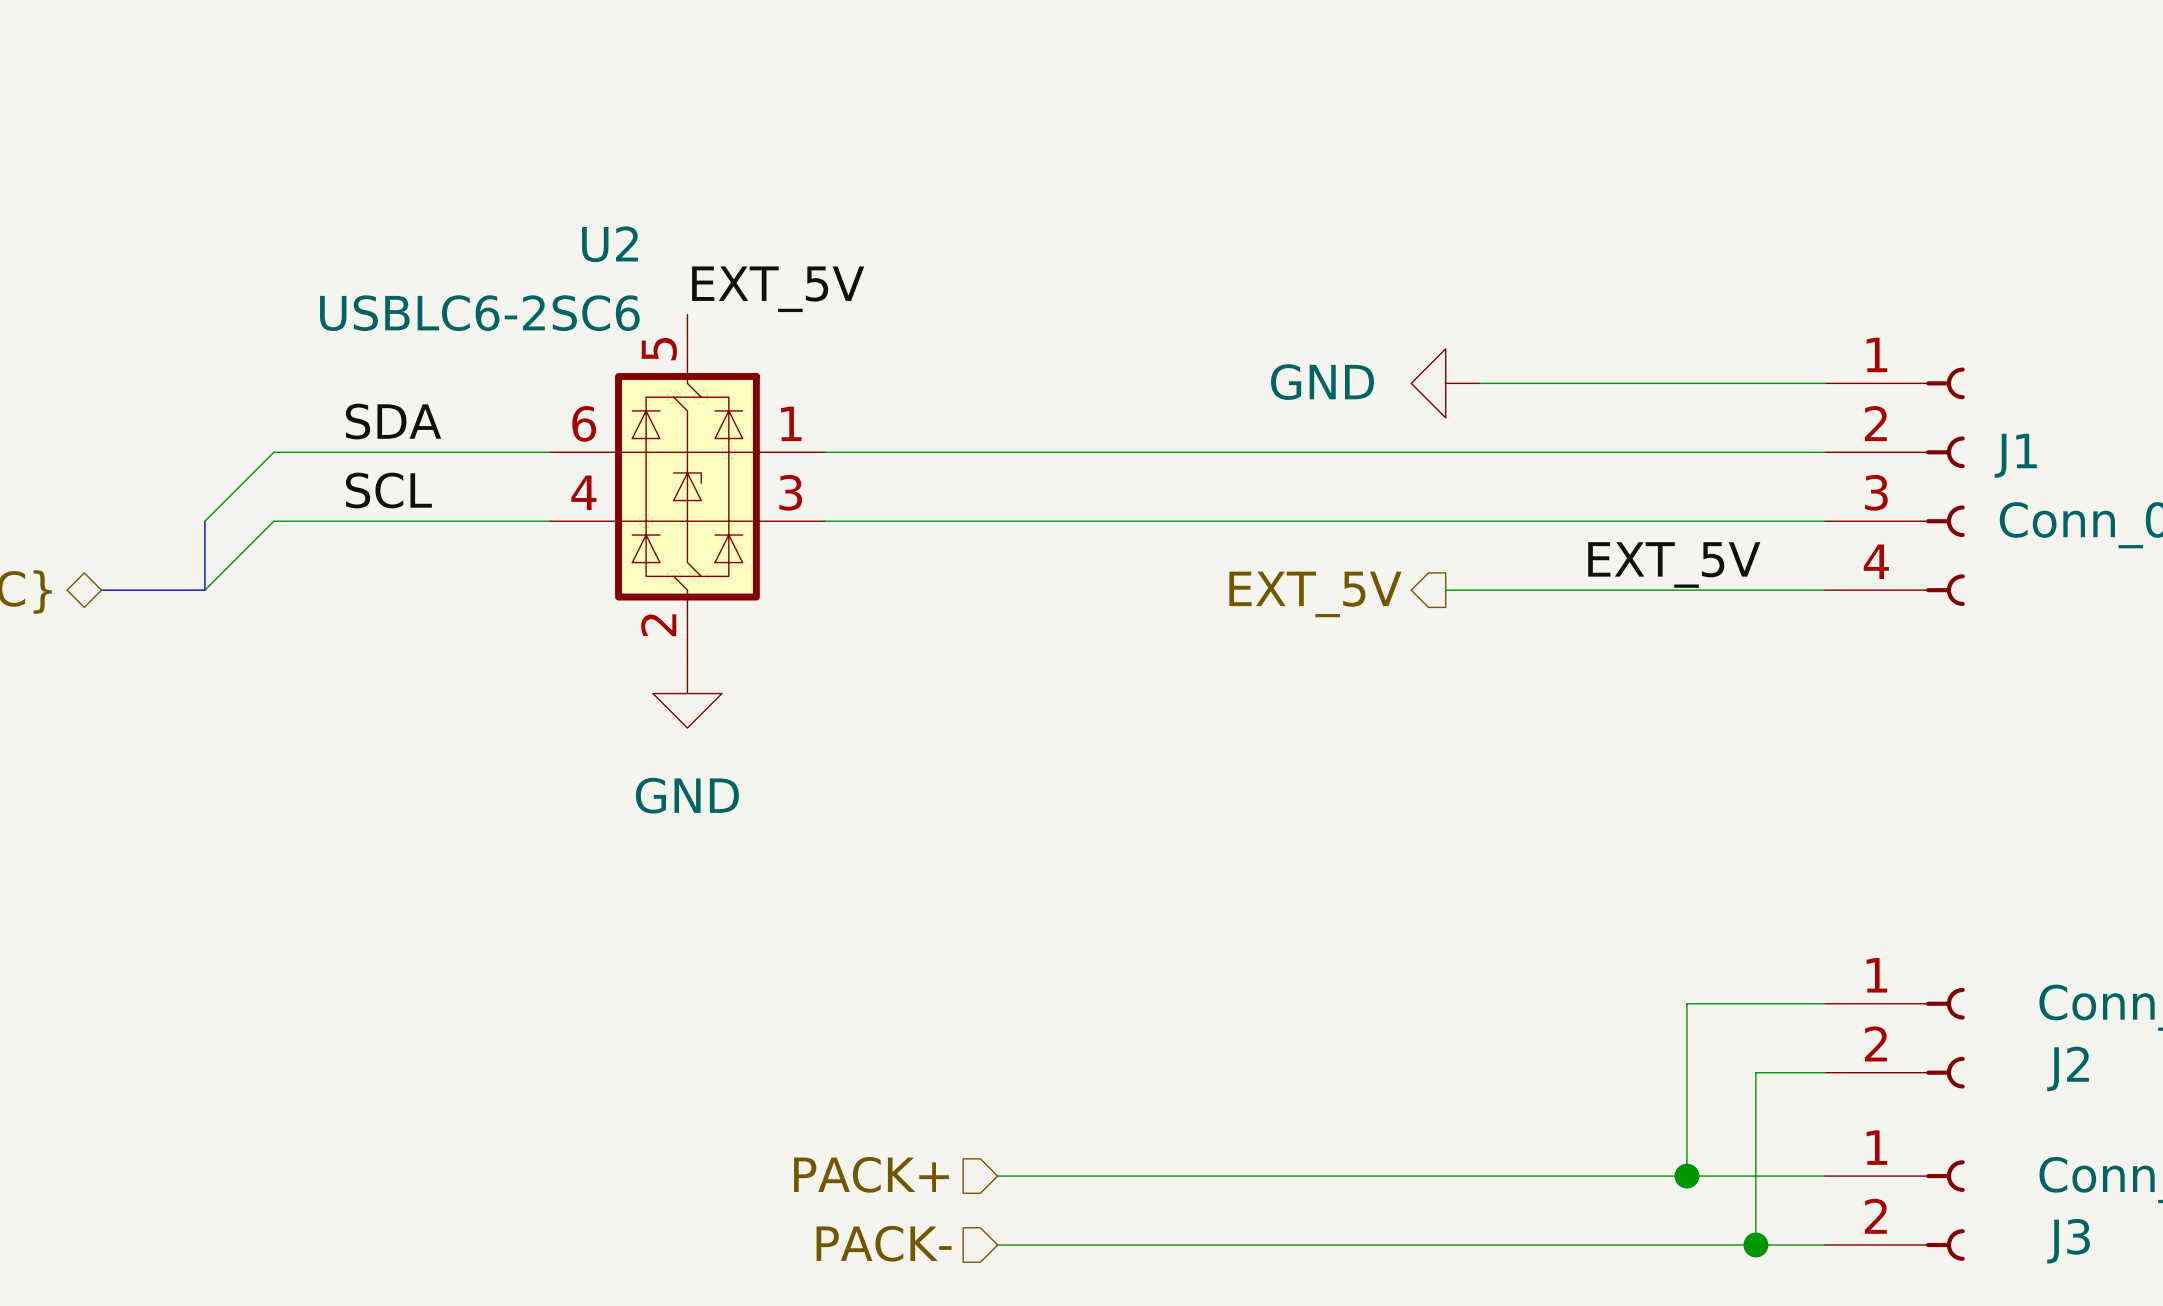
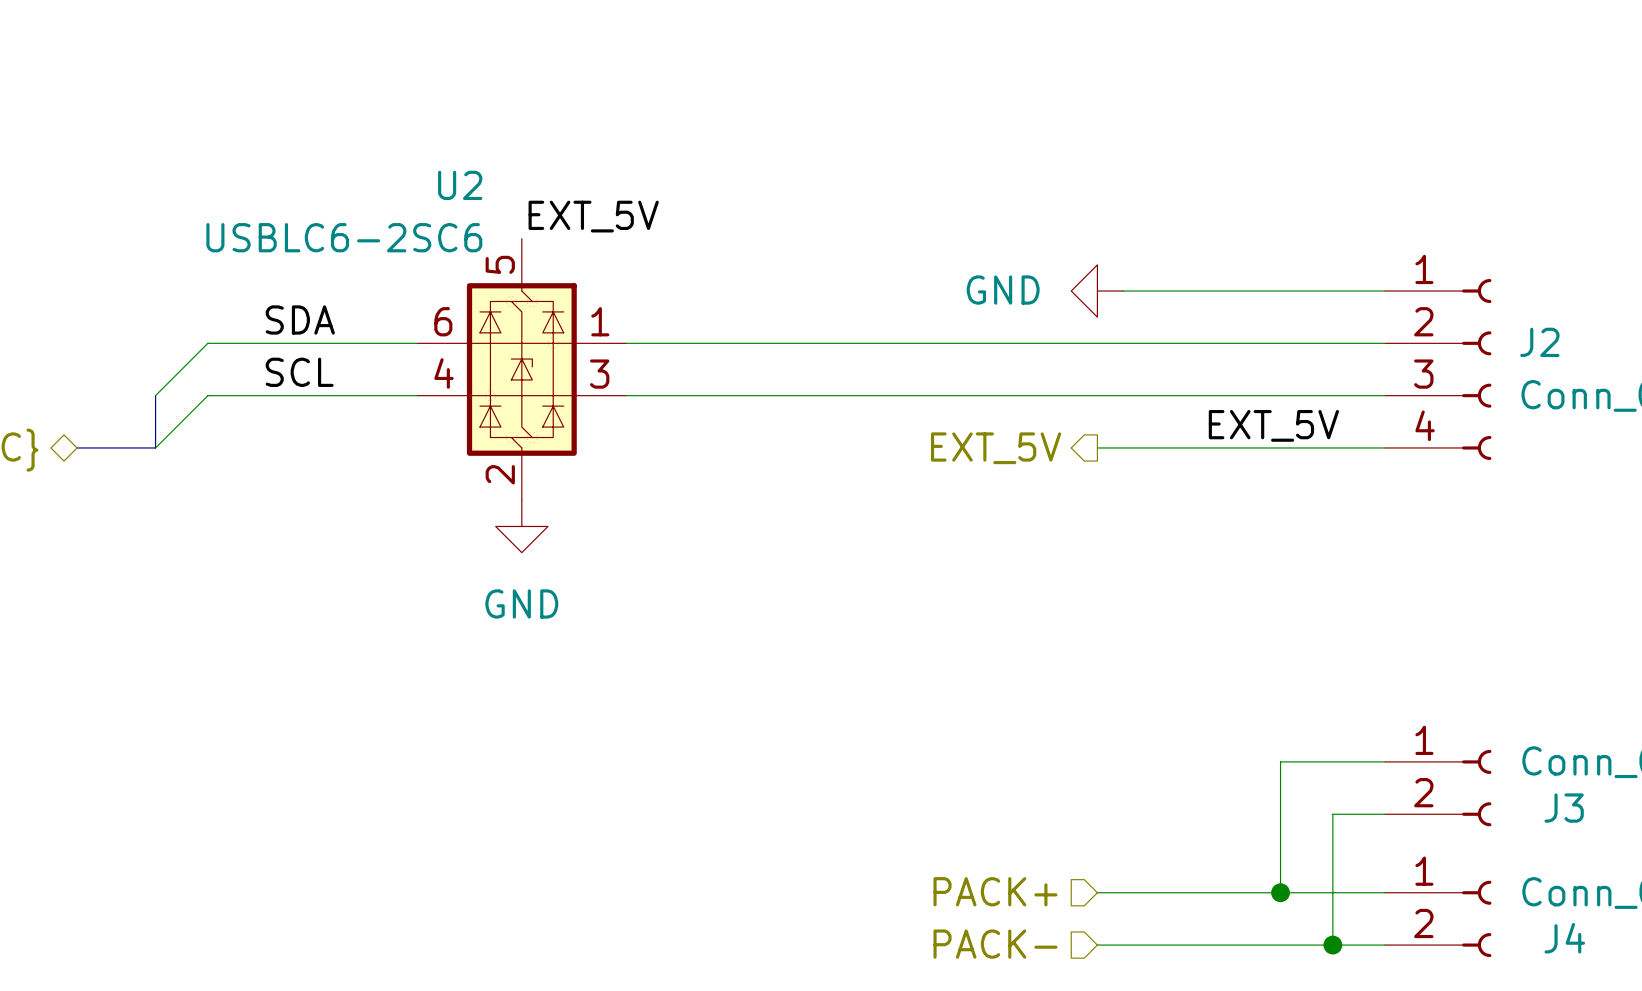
J1 name: J1 (2015, 455) -> J2 (1539, 342)
J2 name: J2 (2068, 1068) -> J3 (1564, 808)
hierarchical label position: PACK+ (871, 1174) -> PACK+ (995, 891)
wire: (997, 1176) (1445, 1176) -> none
J3 name: J3 (2068, 1241) -> J4 (1564, 938)
hierarchical label position: PACK- (884, 1243) -> PACK- (995, 944)
wire: (997, 1245) (1445, 1245) -> none

